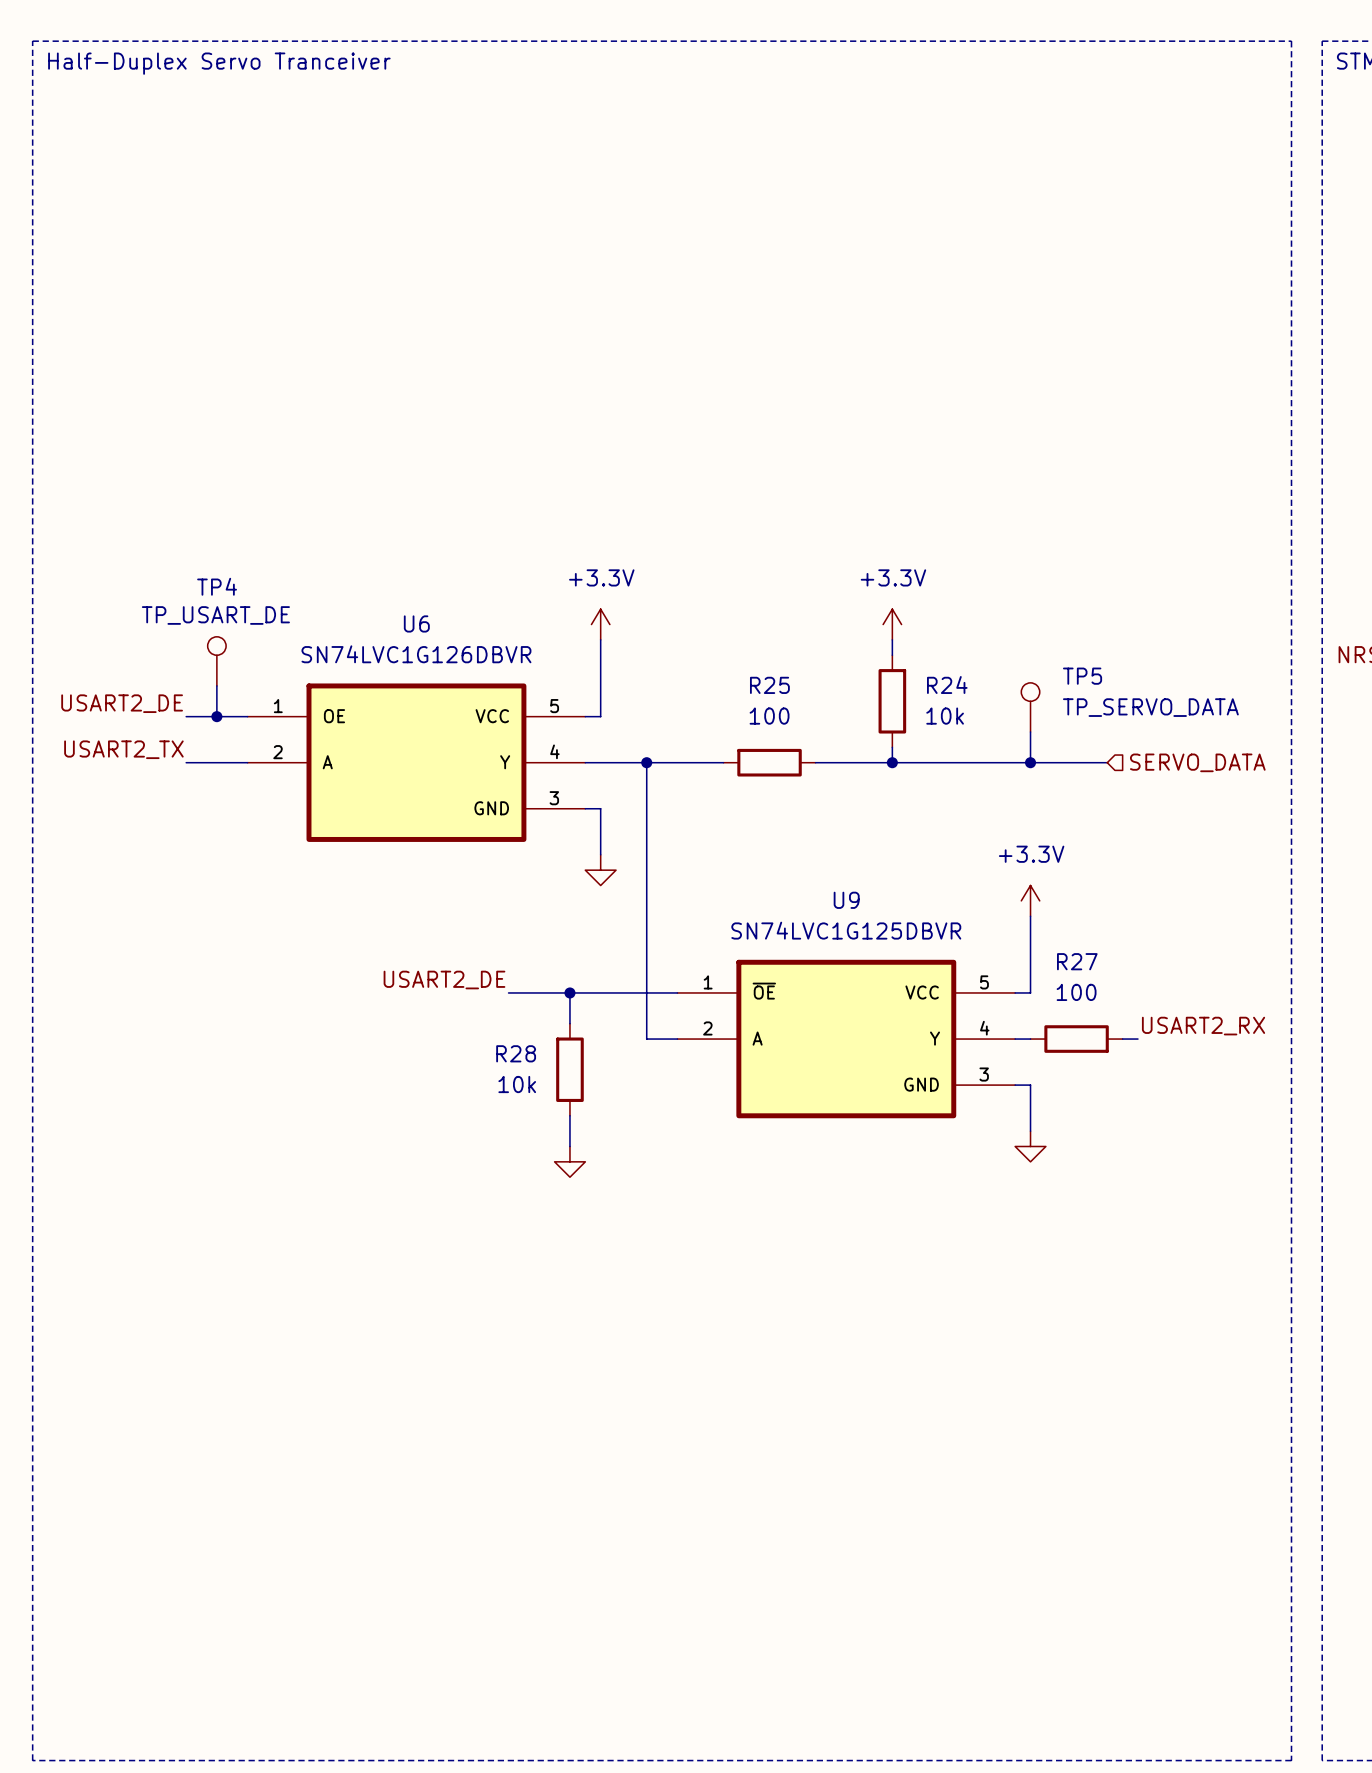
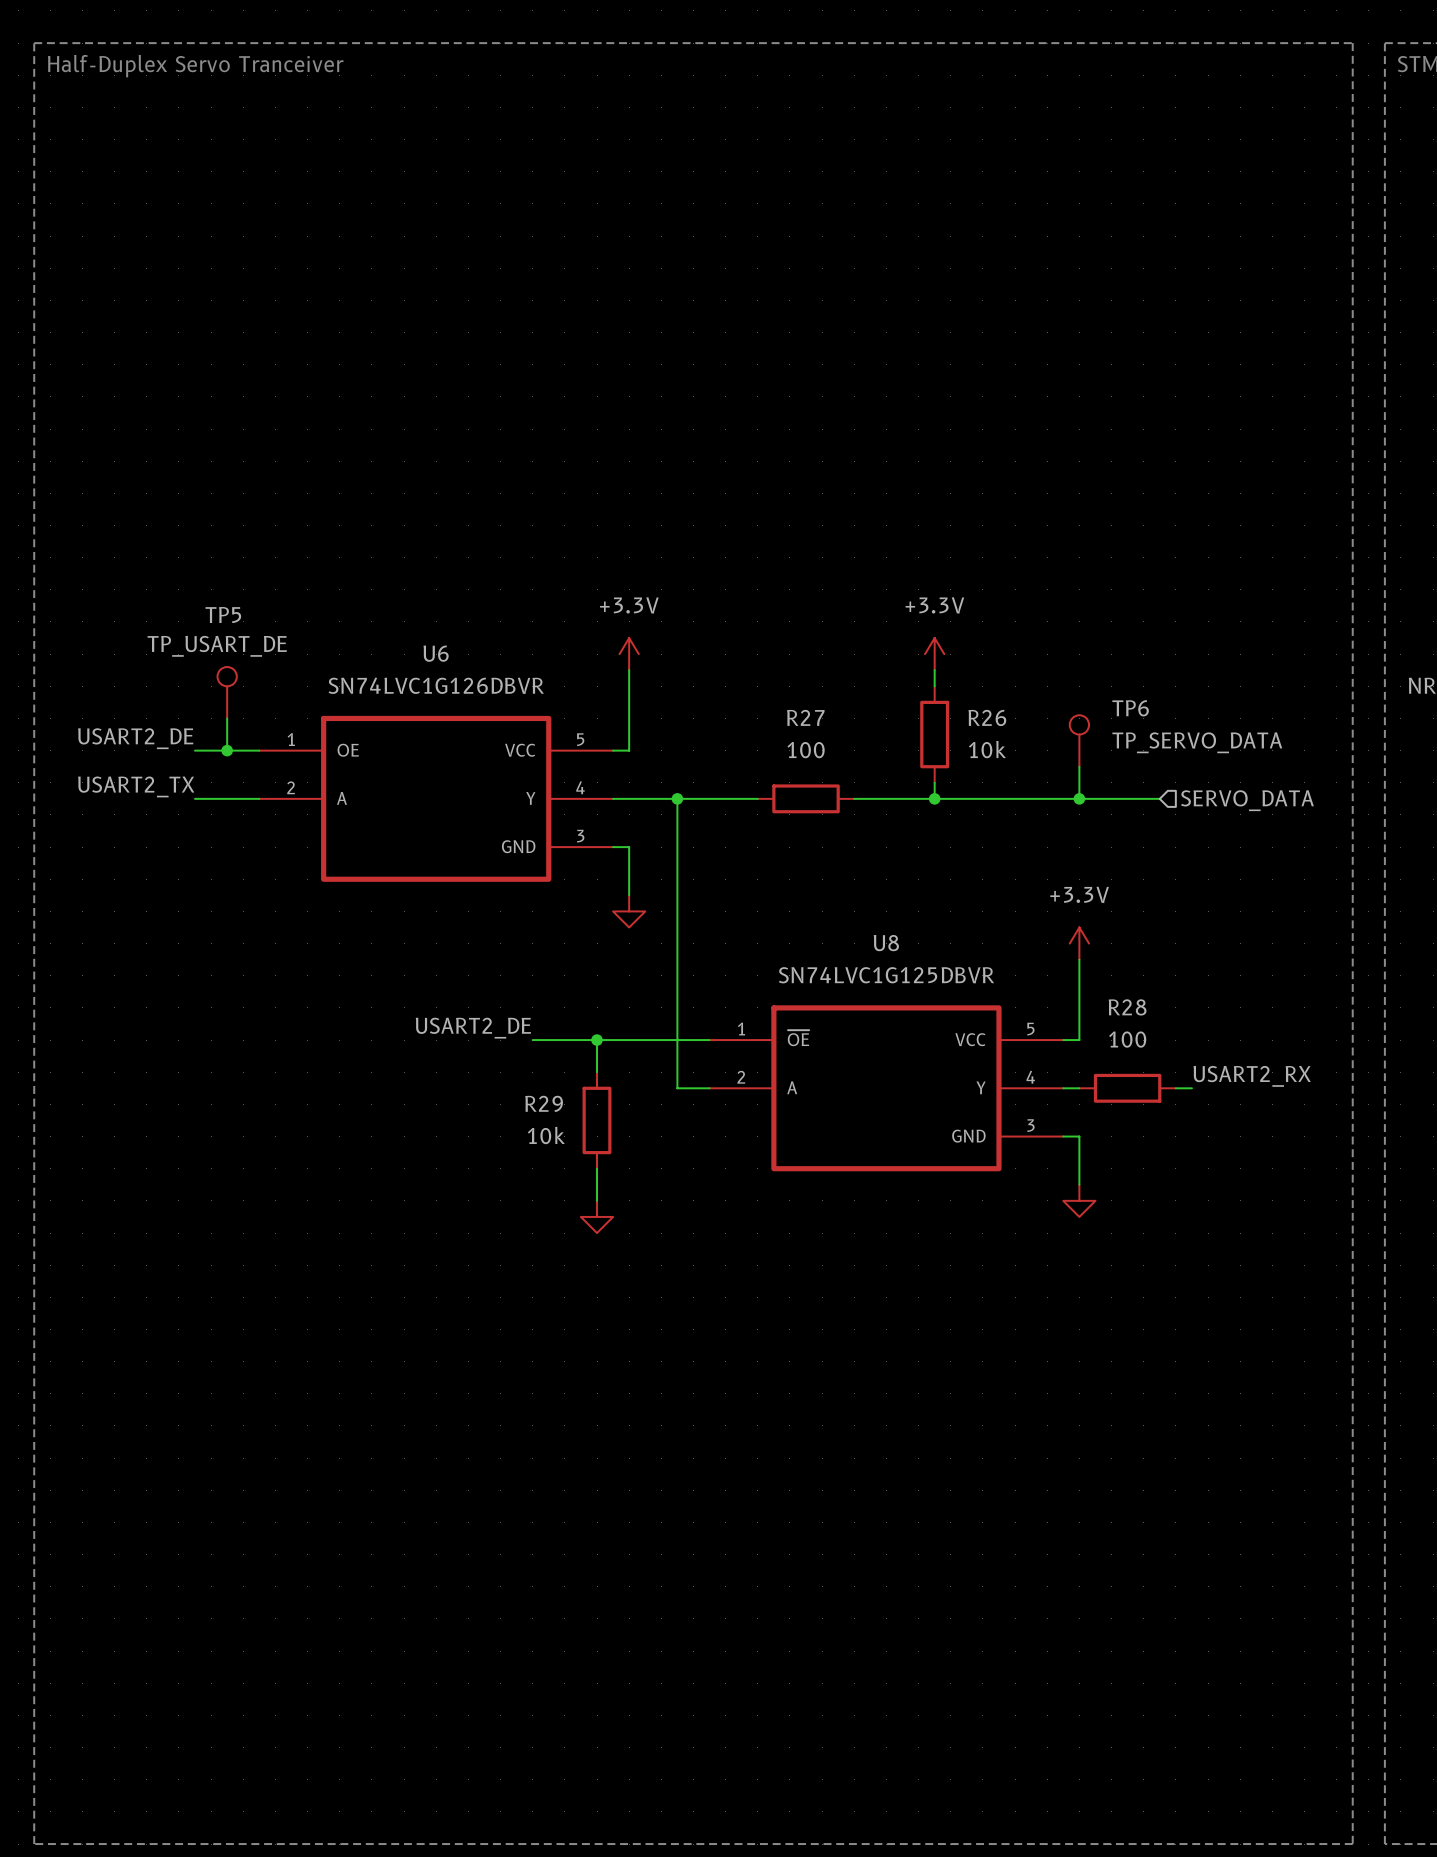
TP4 name: TP4 (217, 586) -> TP5 (223, 615)
TP5 name: TP5 (1082, 676) -> TP6 (1130, 708)
R25 name: R25 (769, 685) -> R27 (805, 717)
R24 name: R24 (947, 685) -> R26 (987, 717)
U9 name: U9 (846, 900) -> U8 (886, 943)
R27 name: R27 (1077, 961) -> R28 (1127, 1007)
R28 name: R28 (516, 1053) -> R29 (544, 1103)

